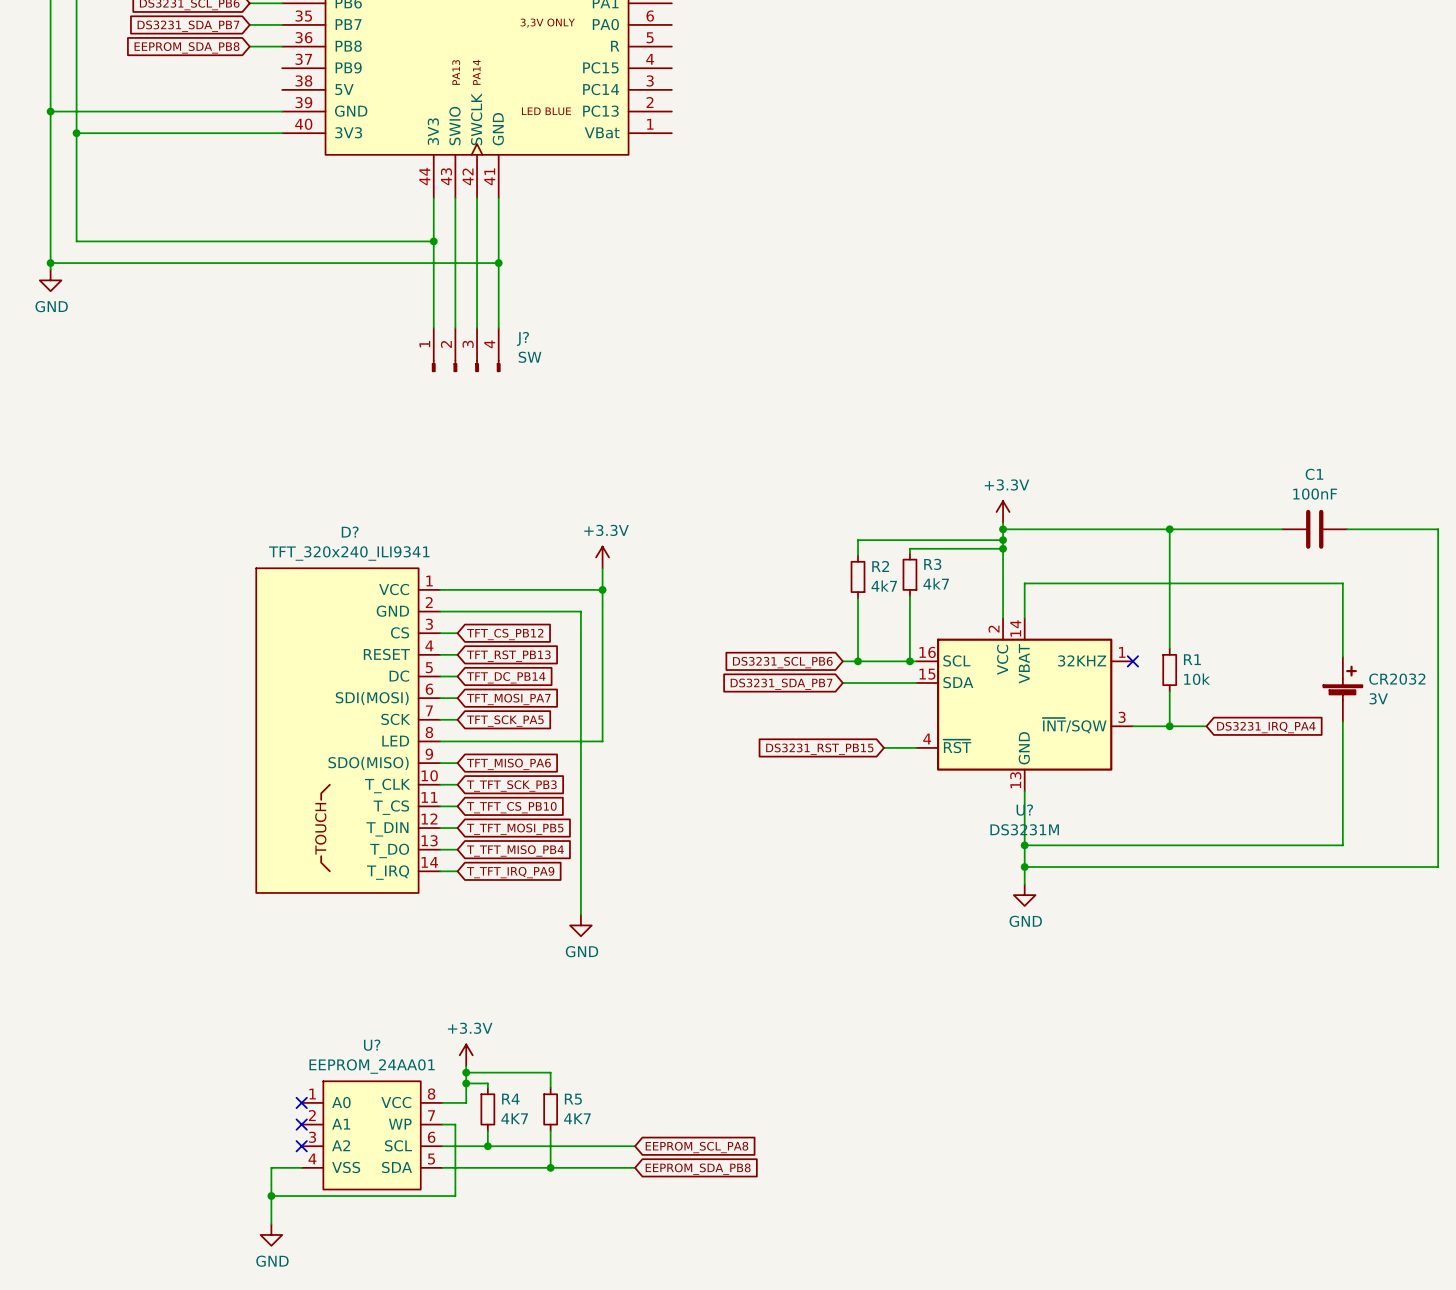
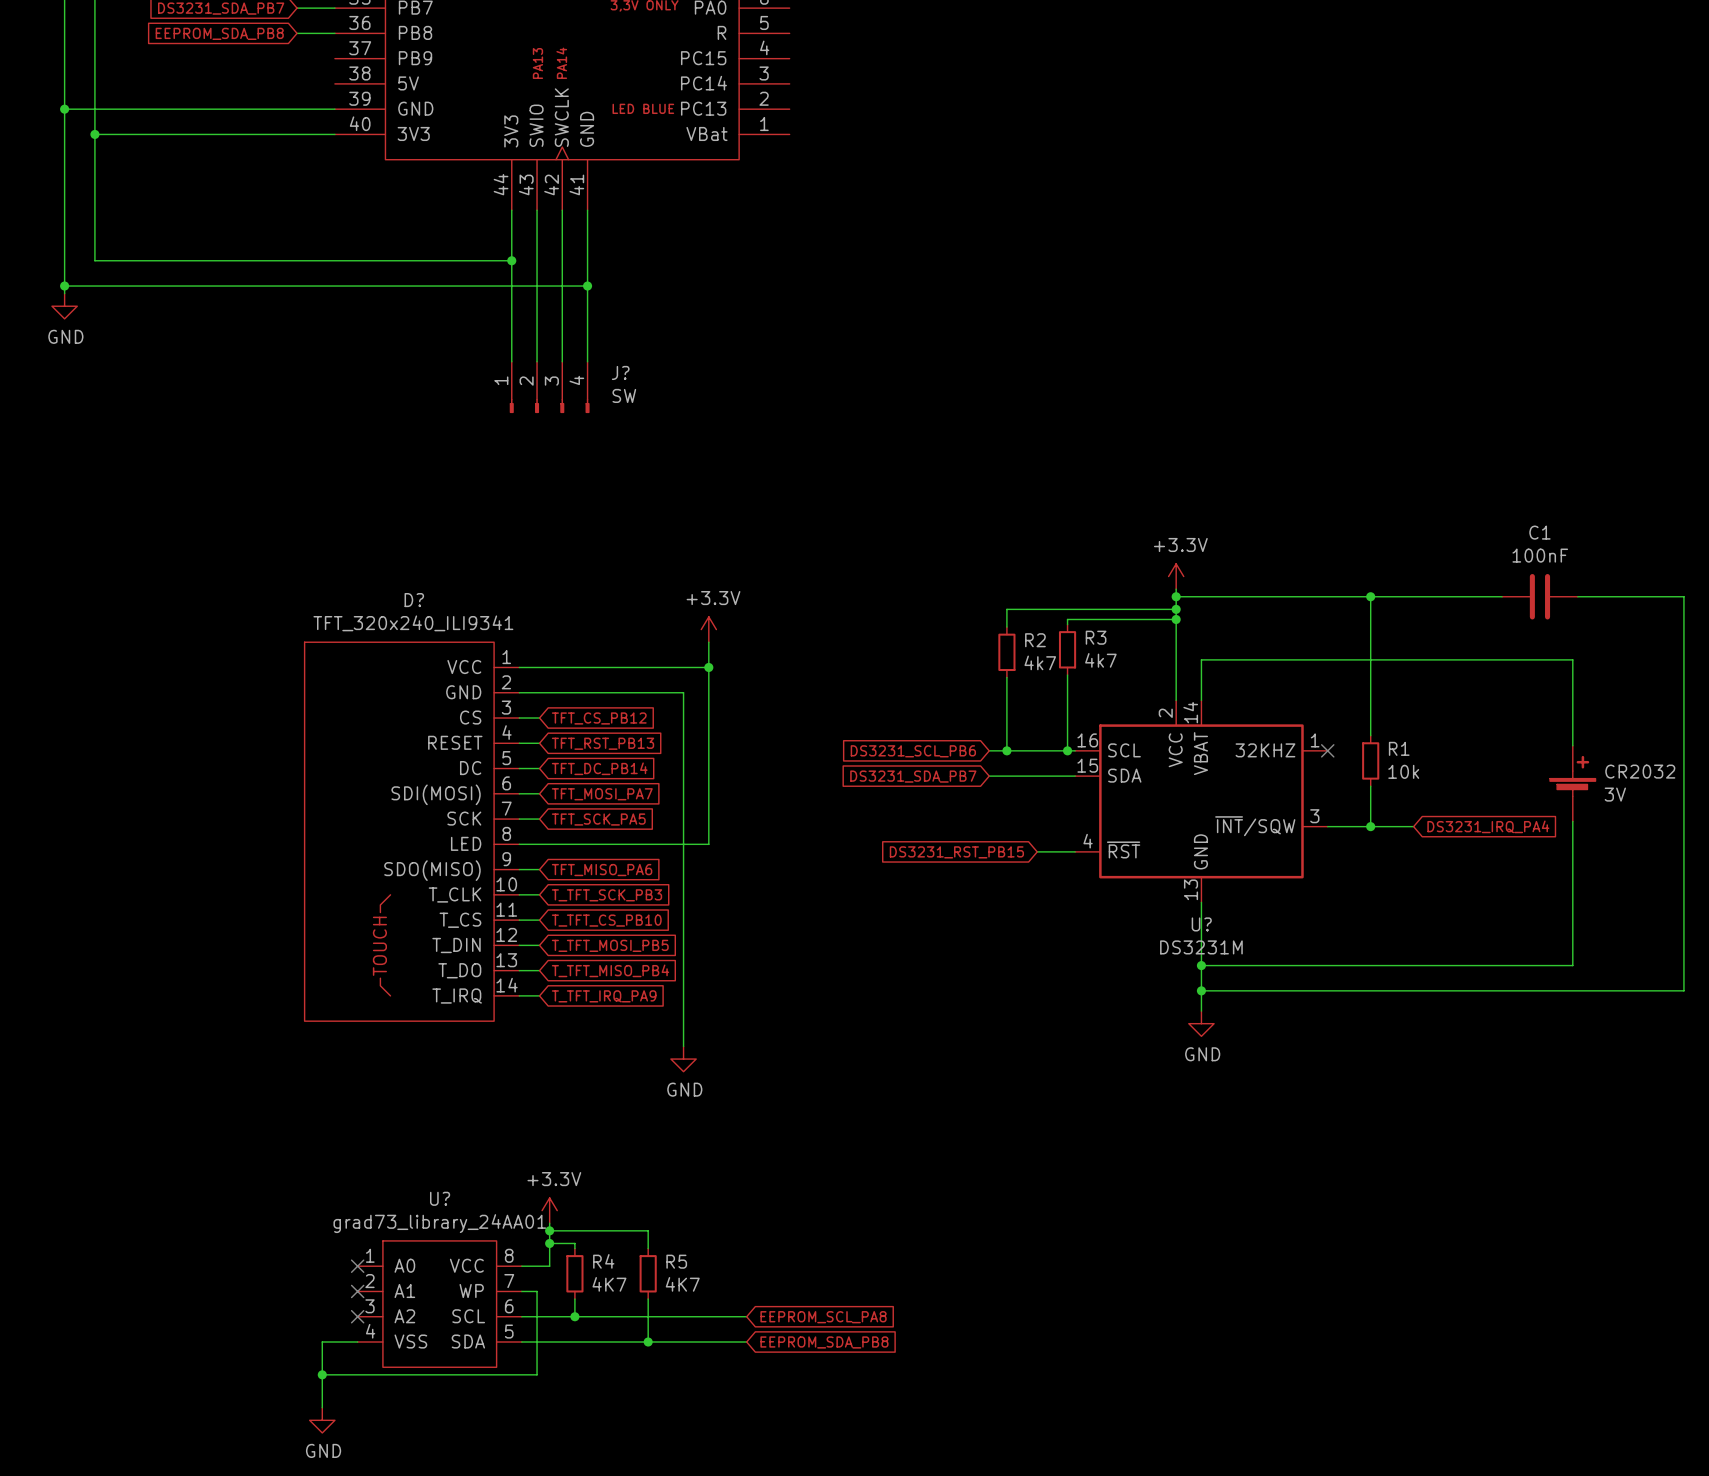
U? value: EEPROM_24AA01 (372, 1066) -> grad73_library_24AA01 (439, 1223)

